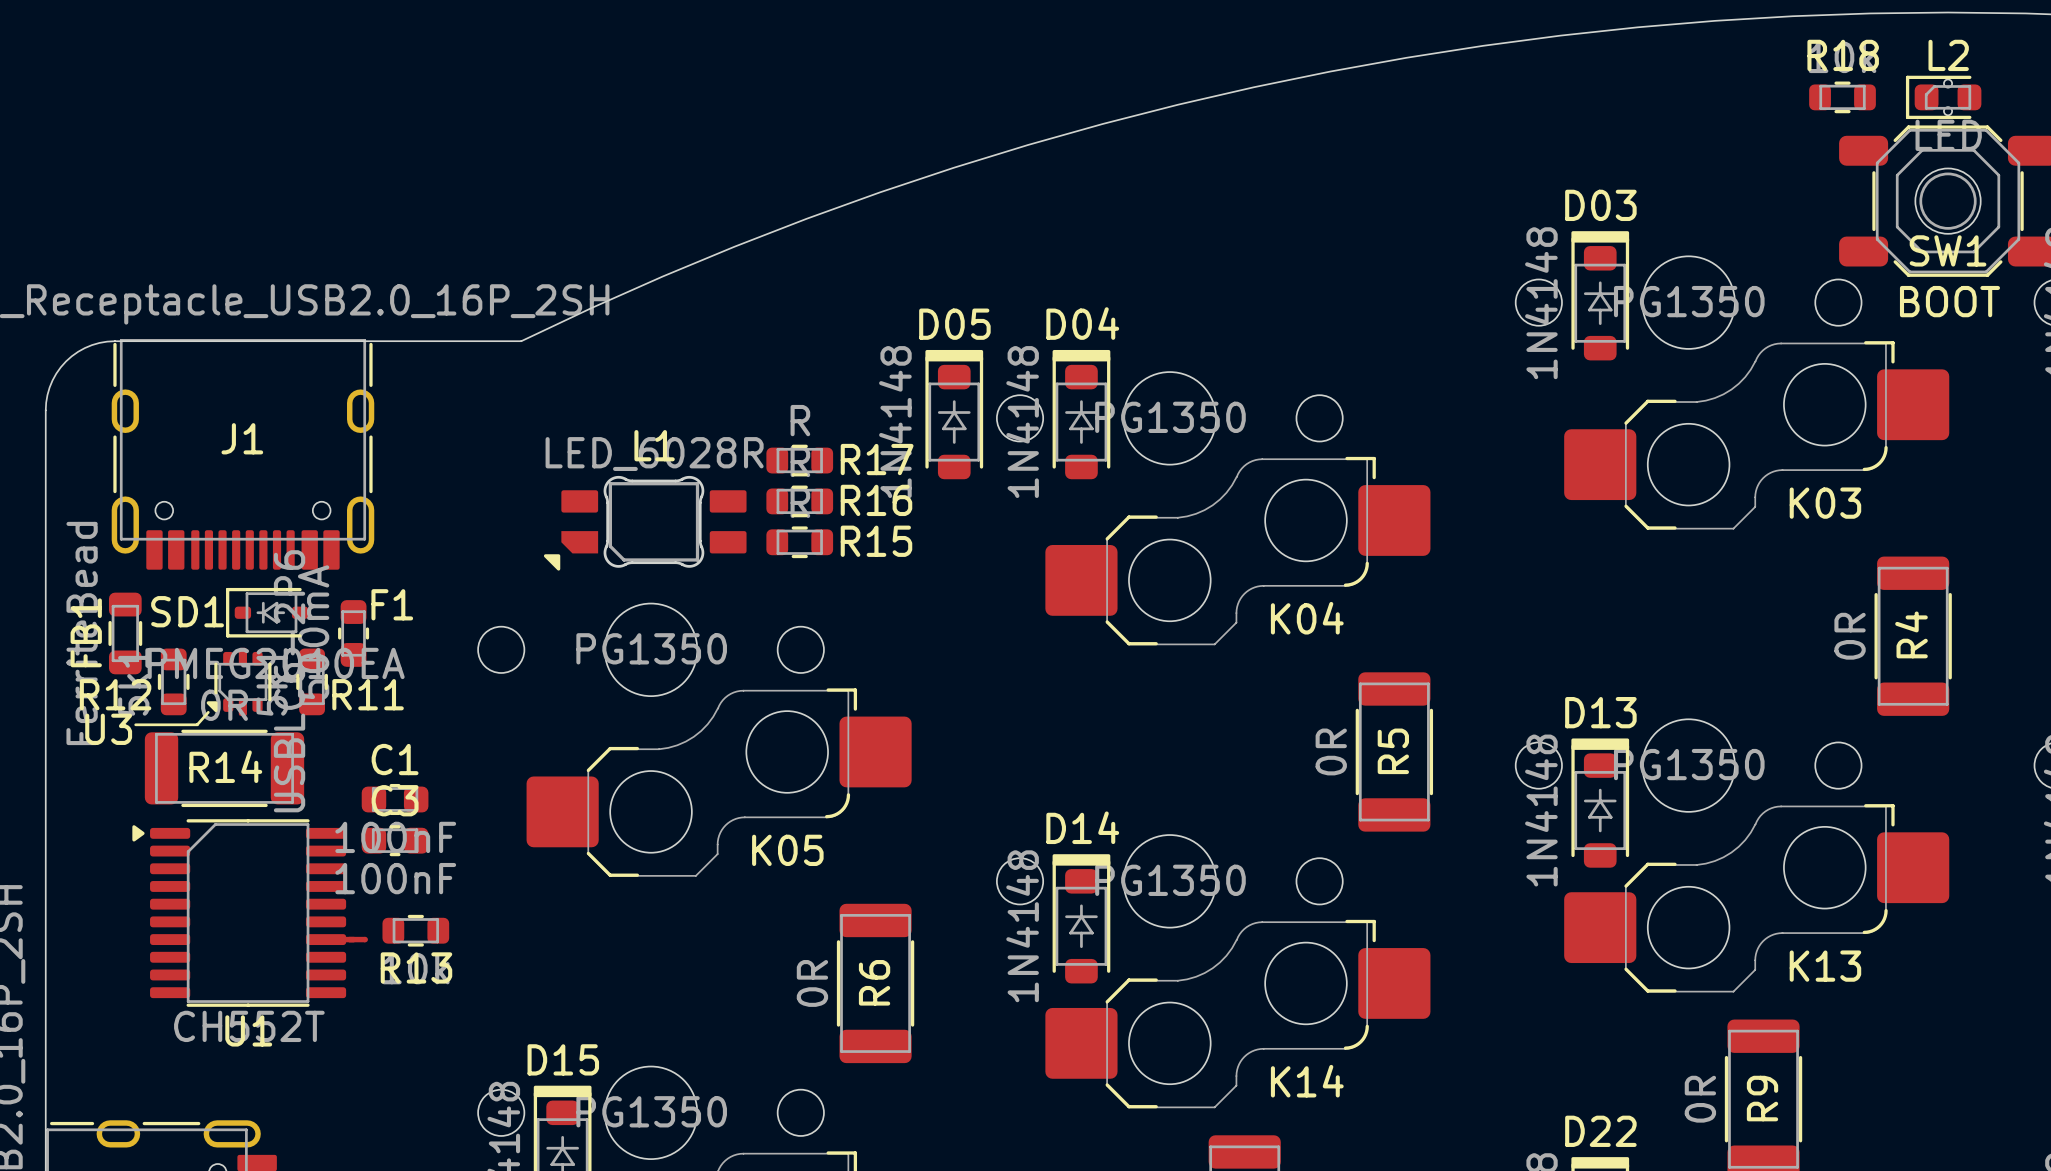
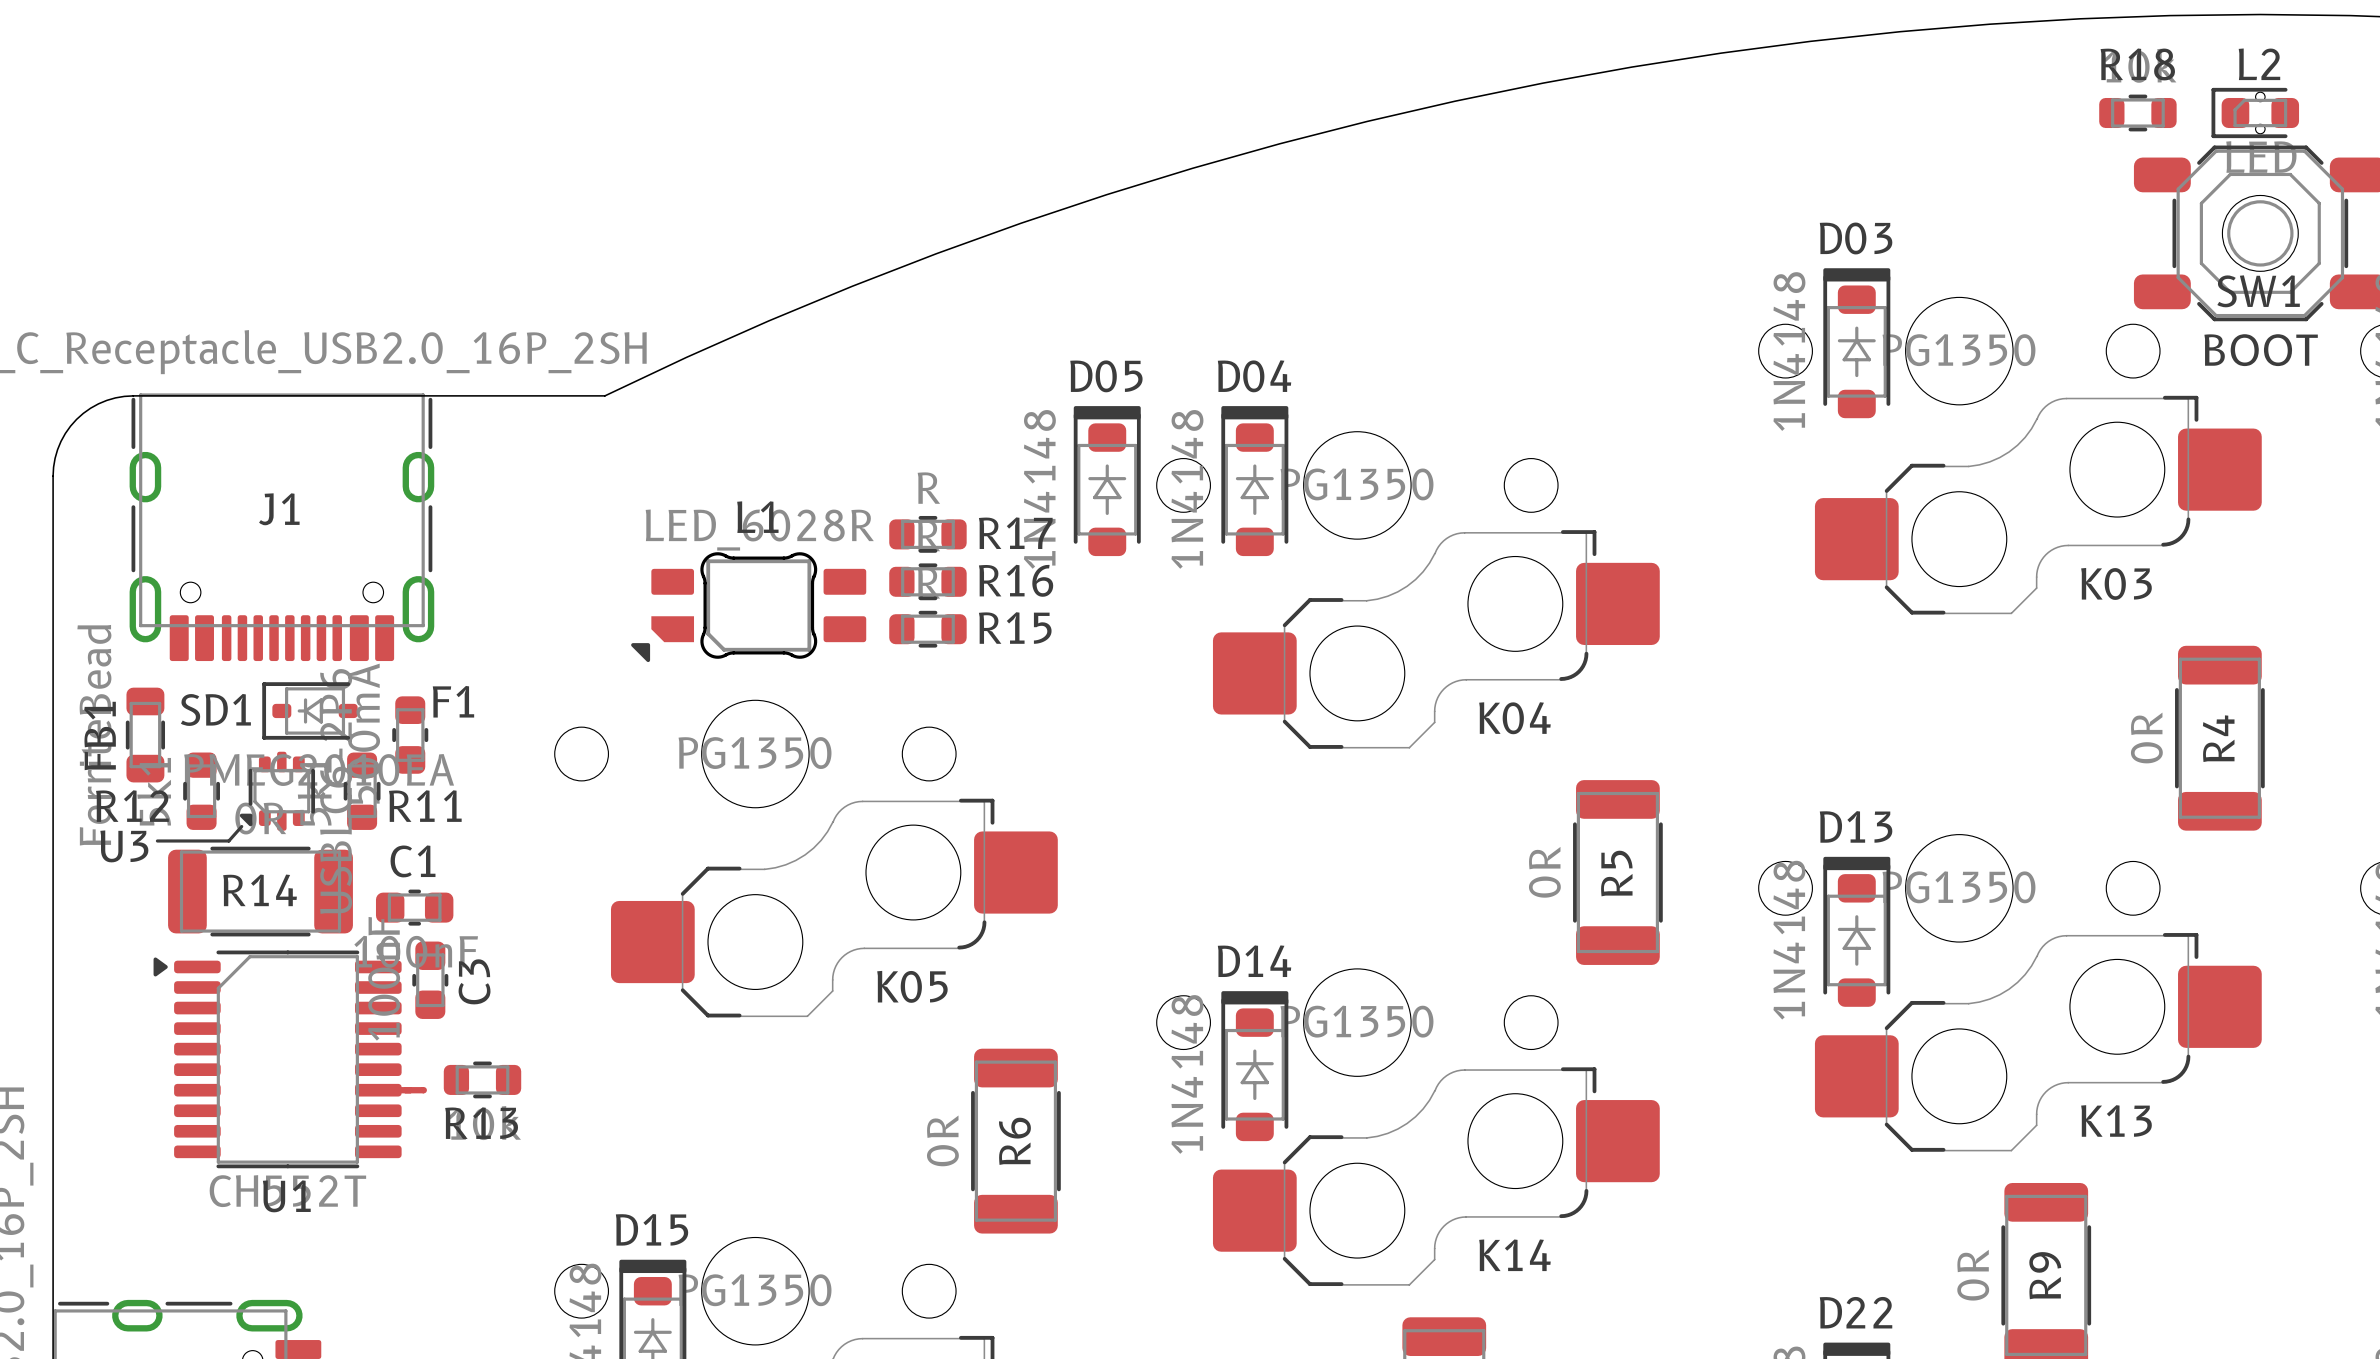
C1 position: (395, 799) -> (414, 907)
C3 rotation: 0° (395, 840) -> 90° clockwise (430, 980)

